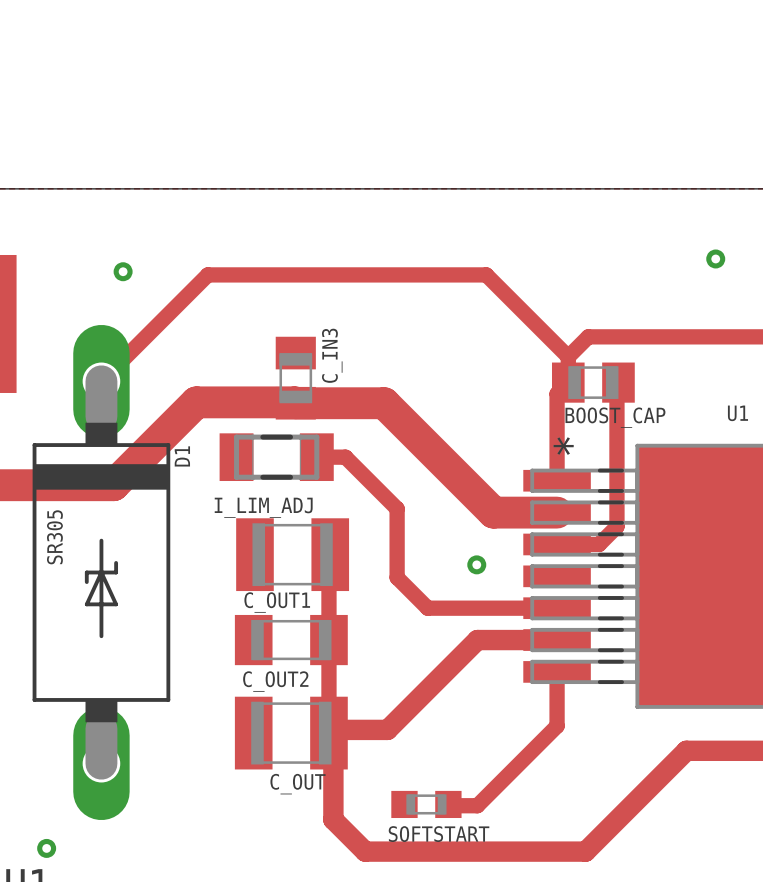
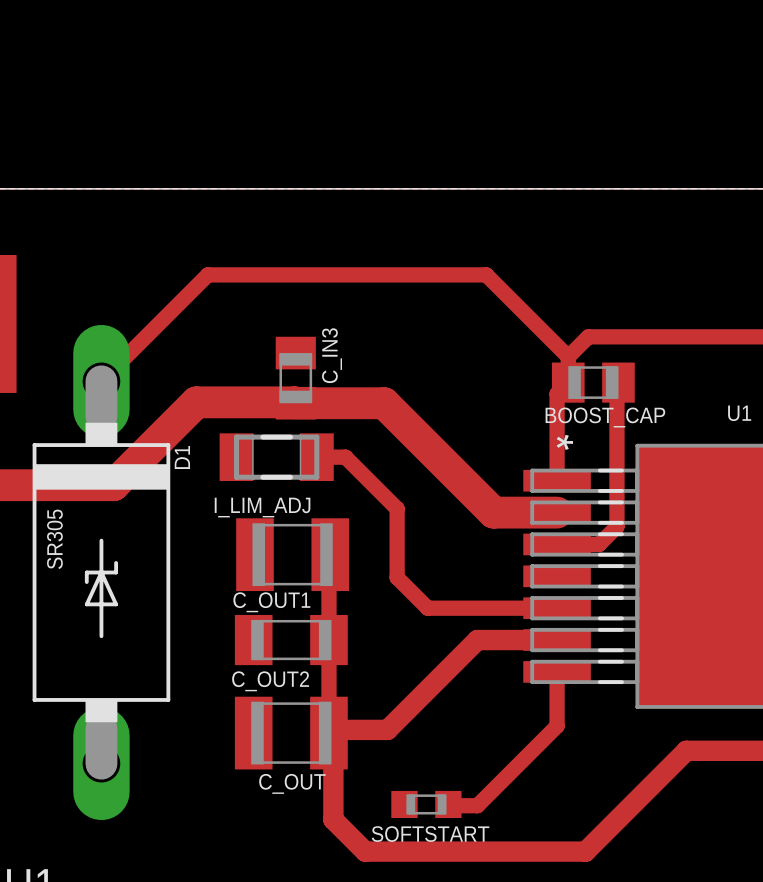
via: (715, 258) -> none
via: (123, 271) -> none
via: (476, 564) -> none
via: (46, 848) -> none

